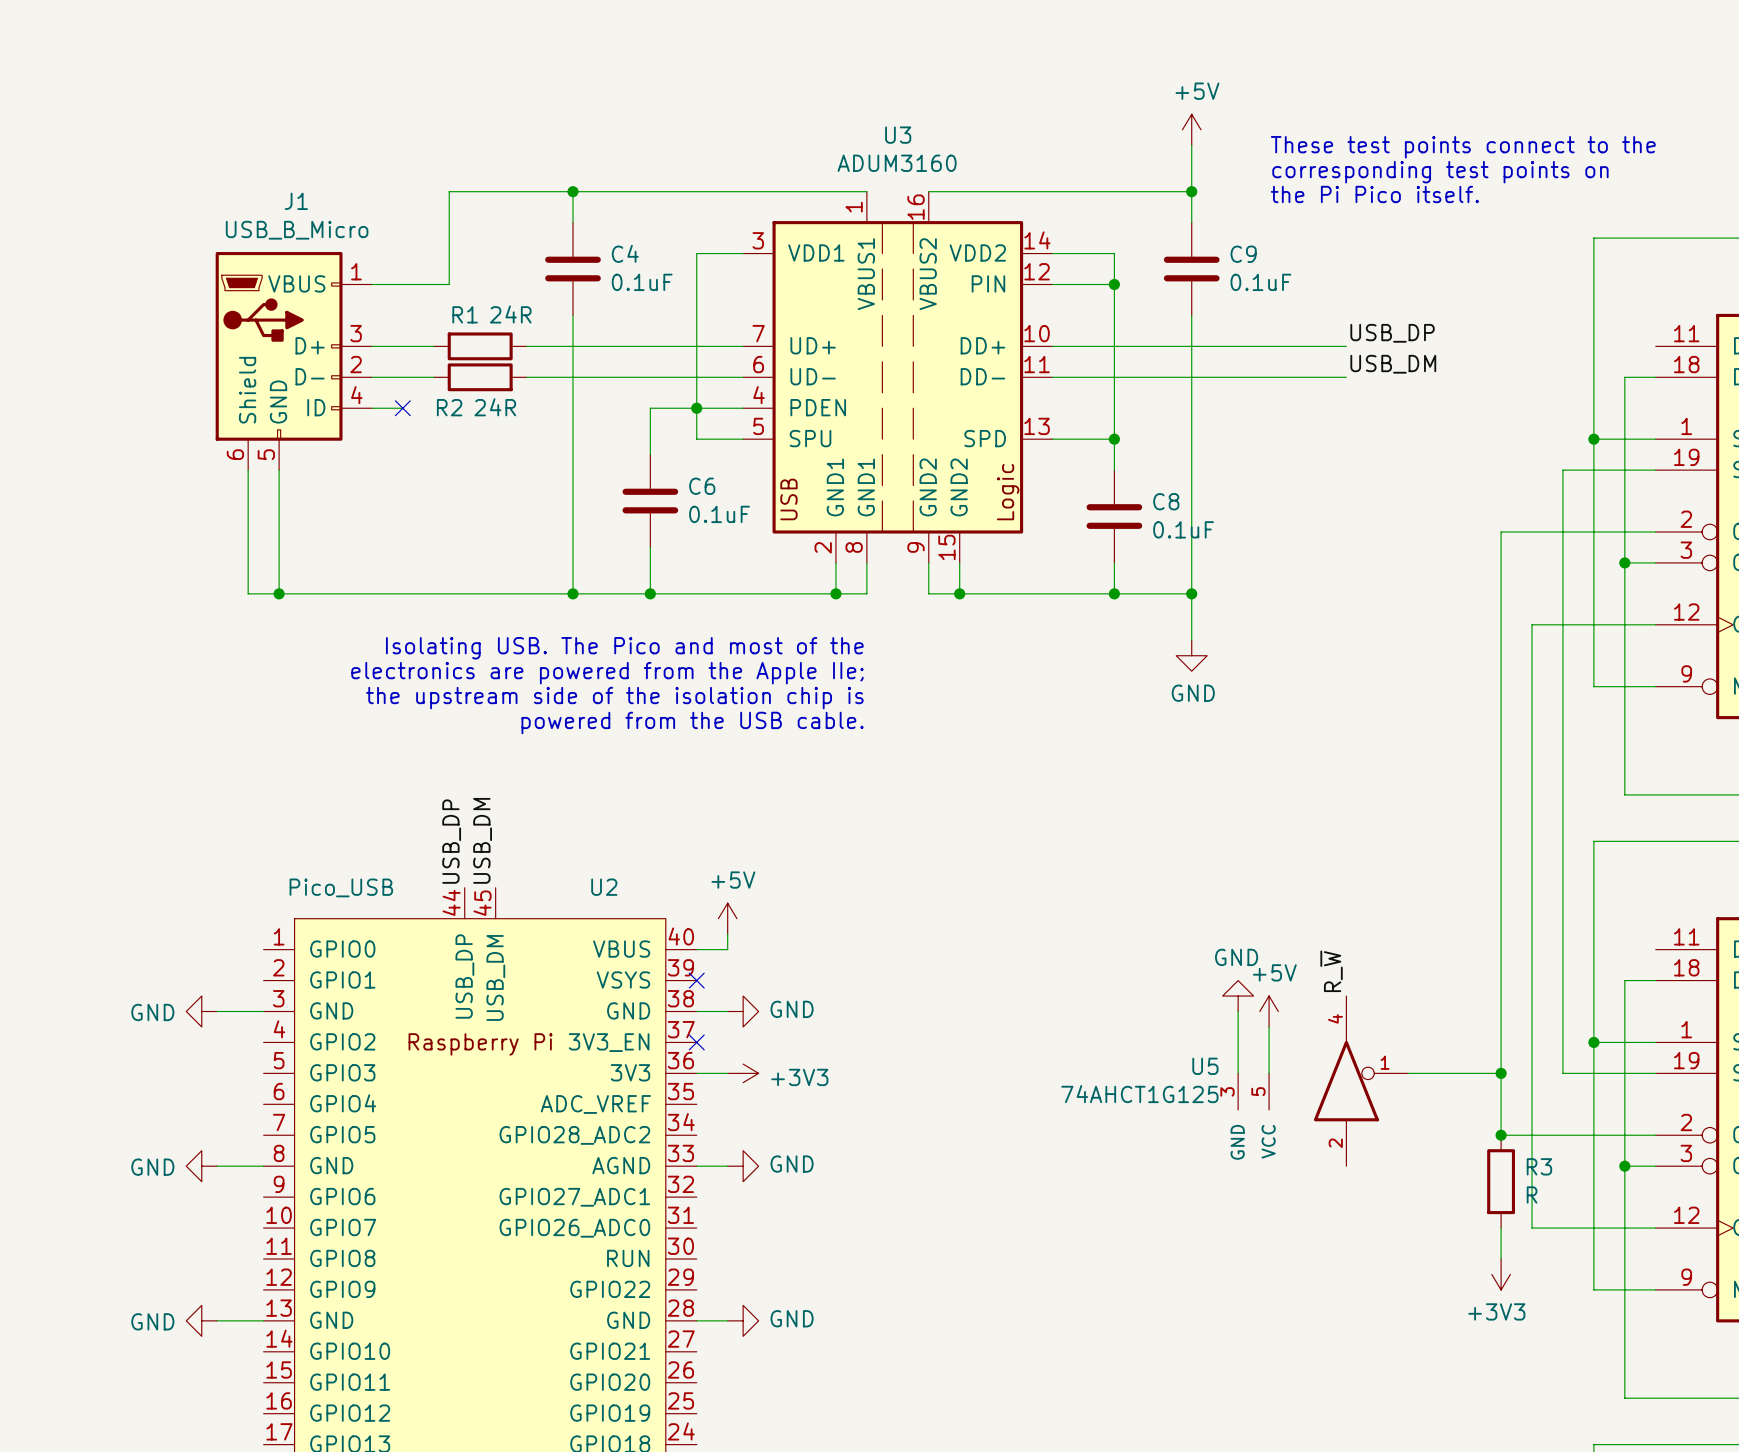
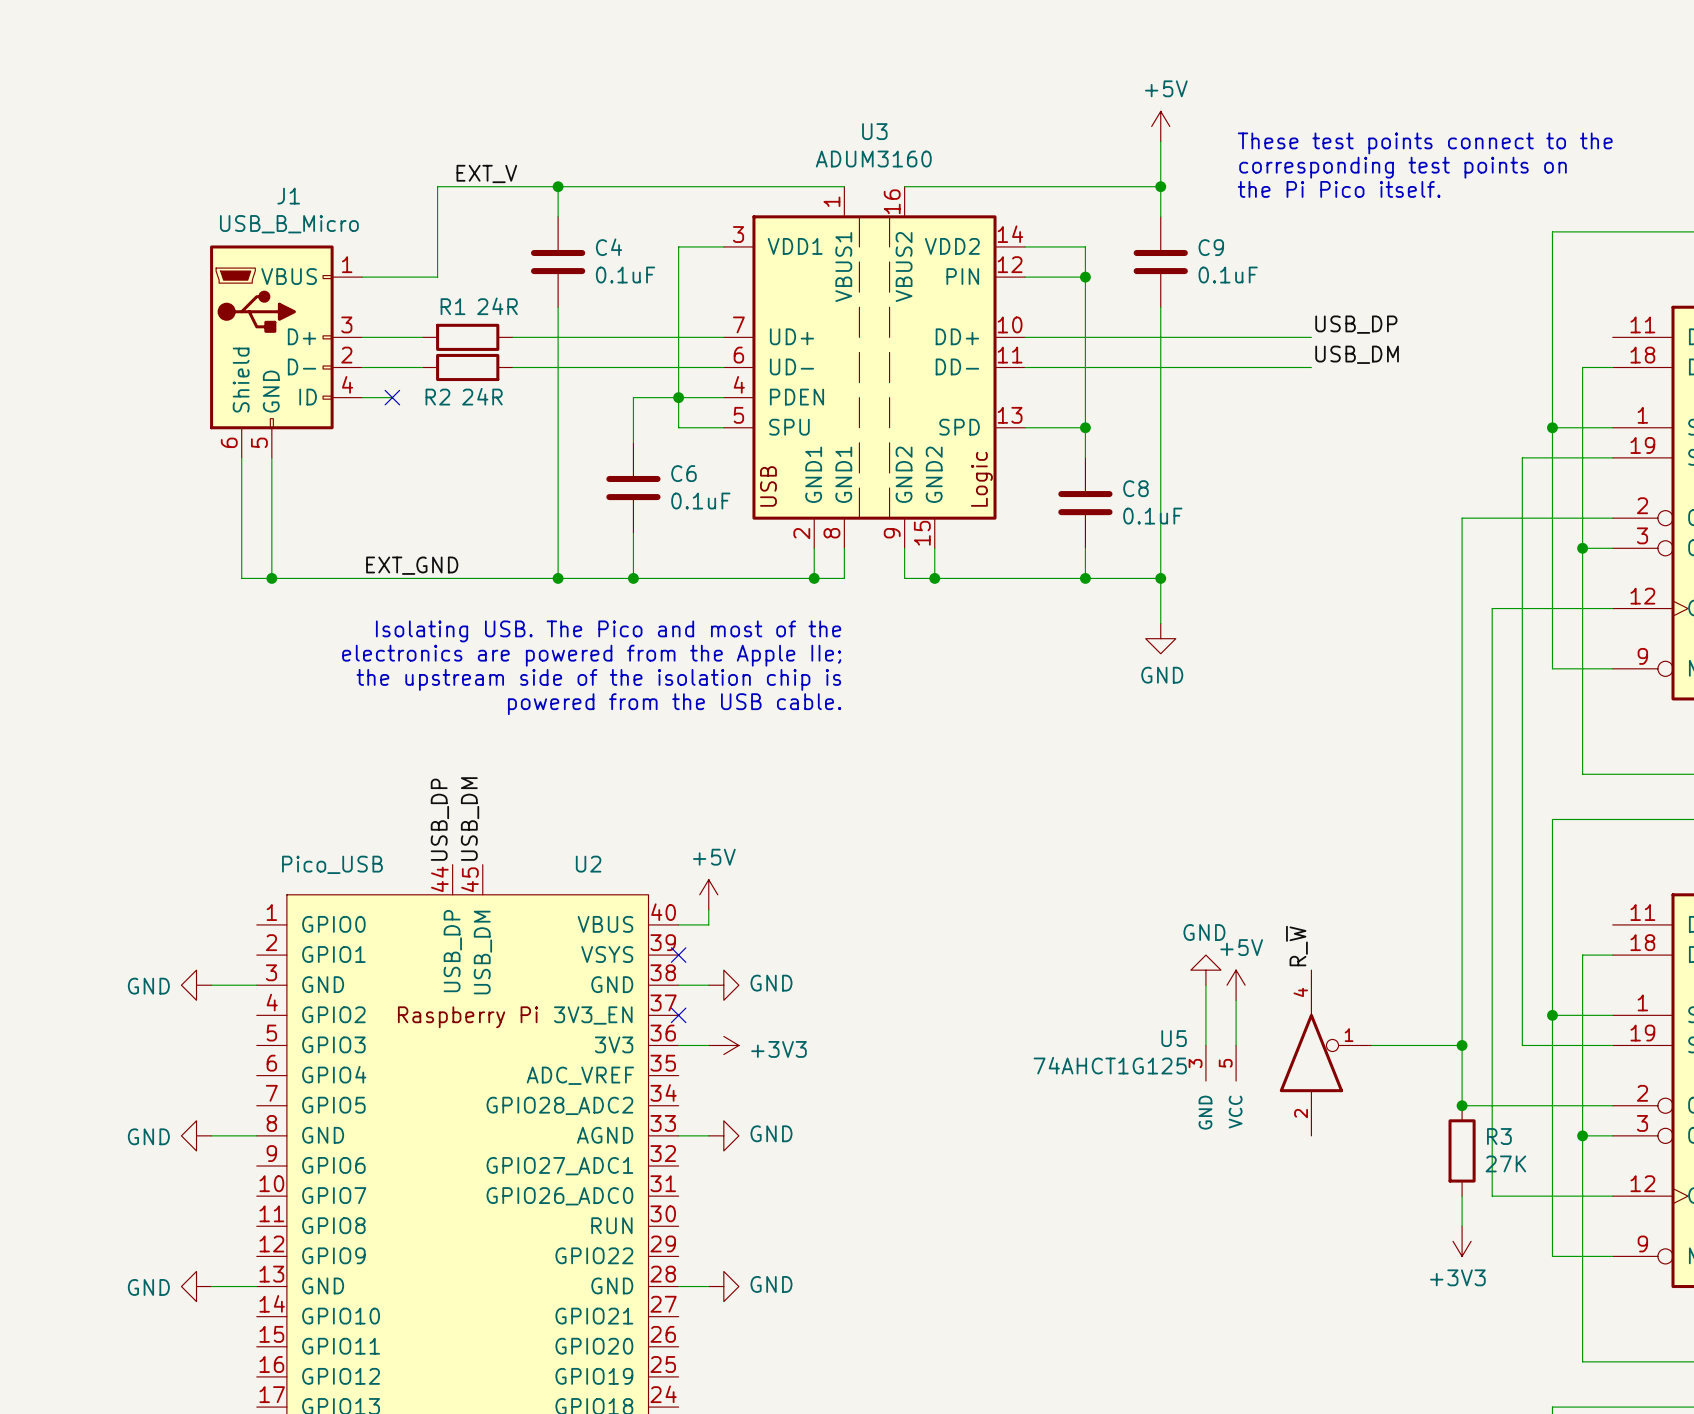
label: none -> EXT_V (486, 173)
label: none -> EXT_GND (412, 565)
R3 value: R (1532, 1195) -> 27K (1505, 1163)

